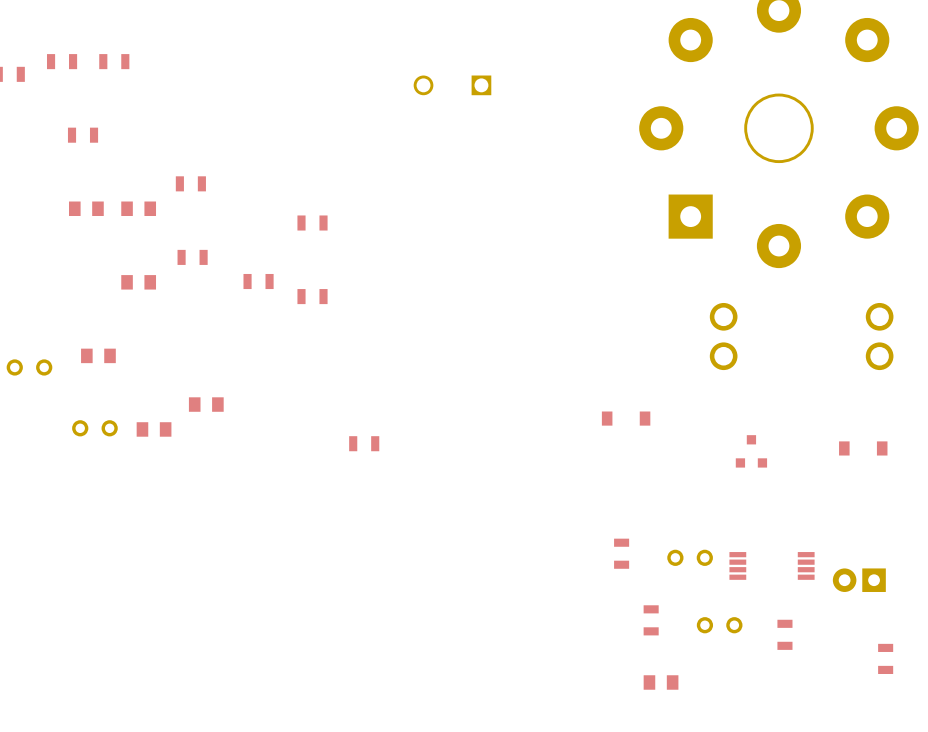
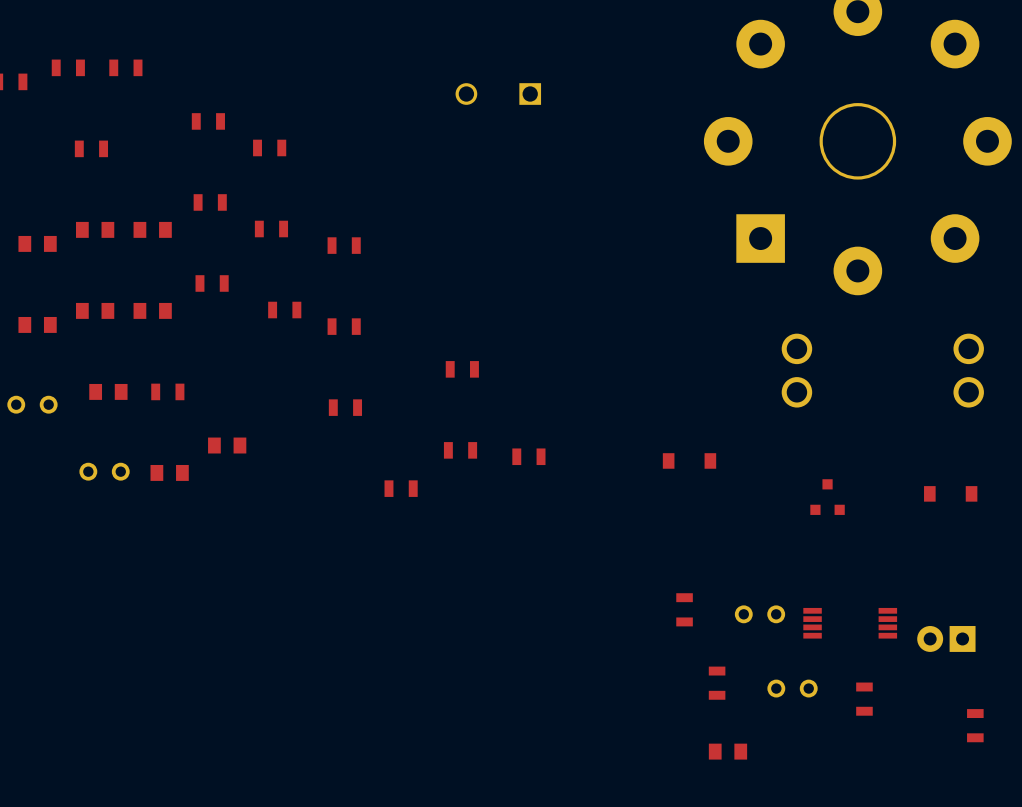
part: none -> (208, 121)
part: none -> (269, 147)
part: none -> (271, 229)
part: none -> (37, 243)
part: none -> (95, 310)
part: none -> (37, 324)
part: none -> (462, 369)
part: none -> (167, 391)
part: none -> (345, 407)
part: none -> (460, 450)
part: none -> (528, 456)

